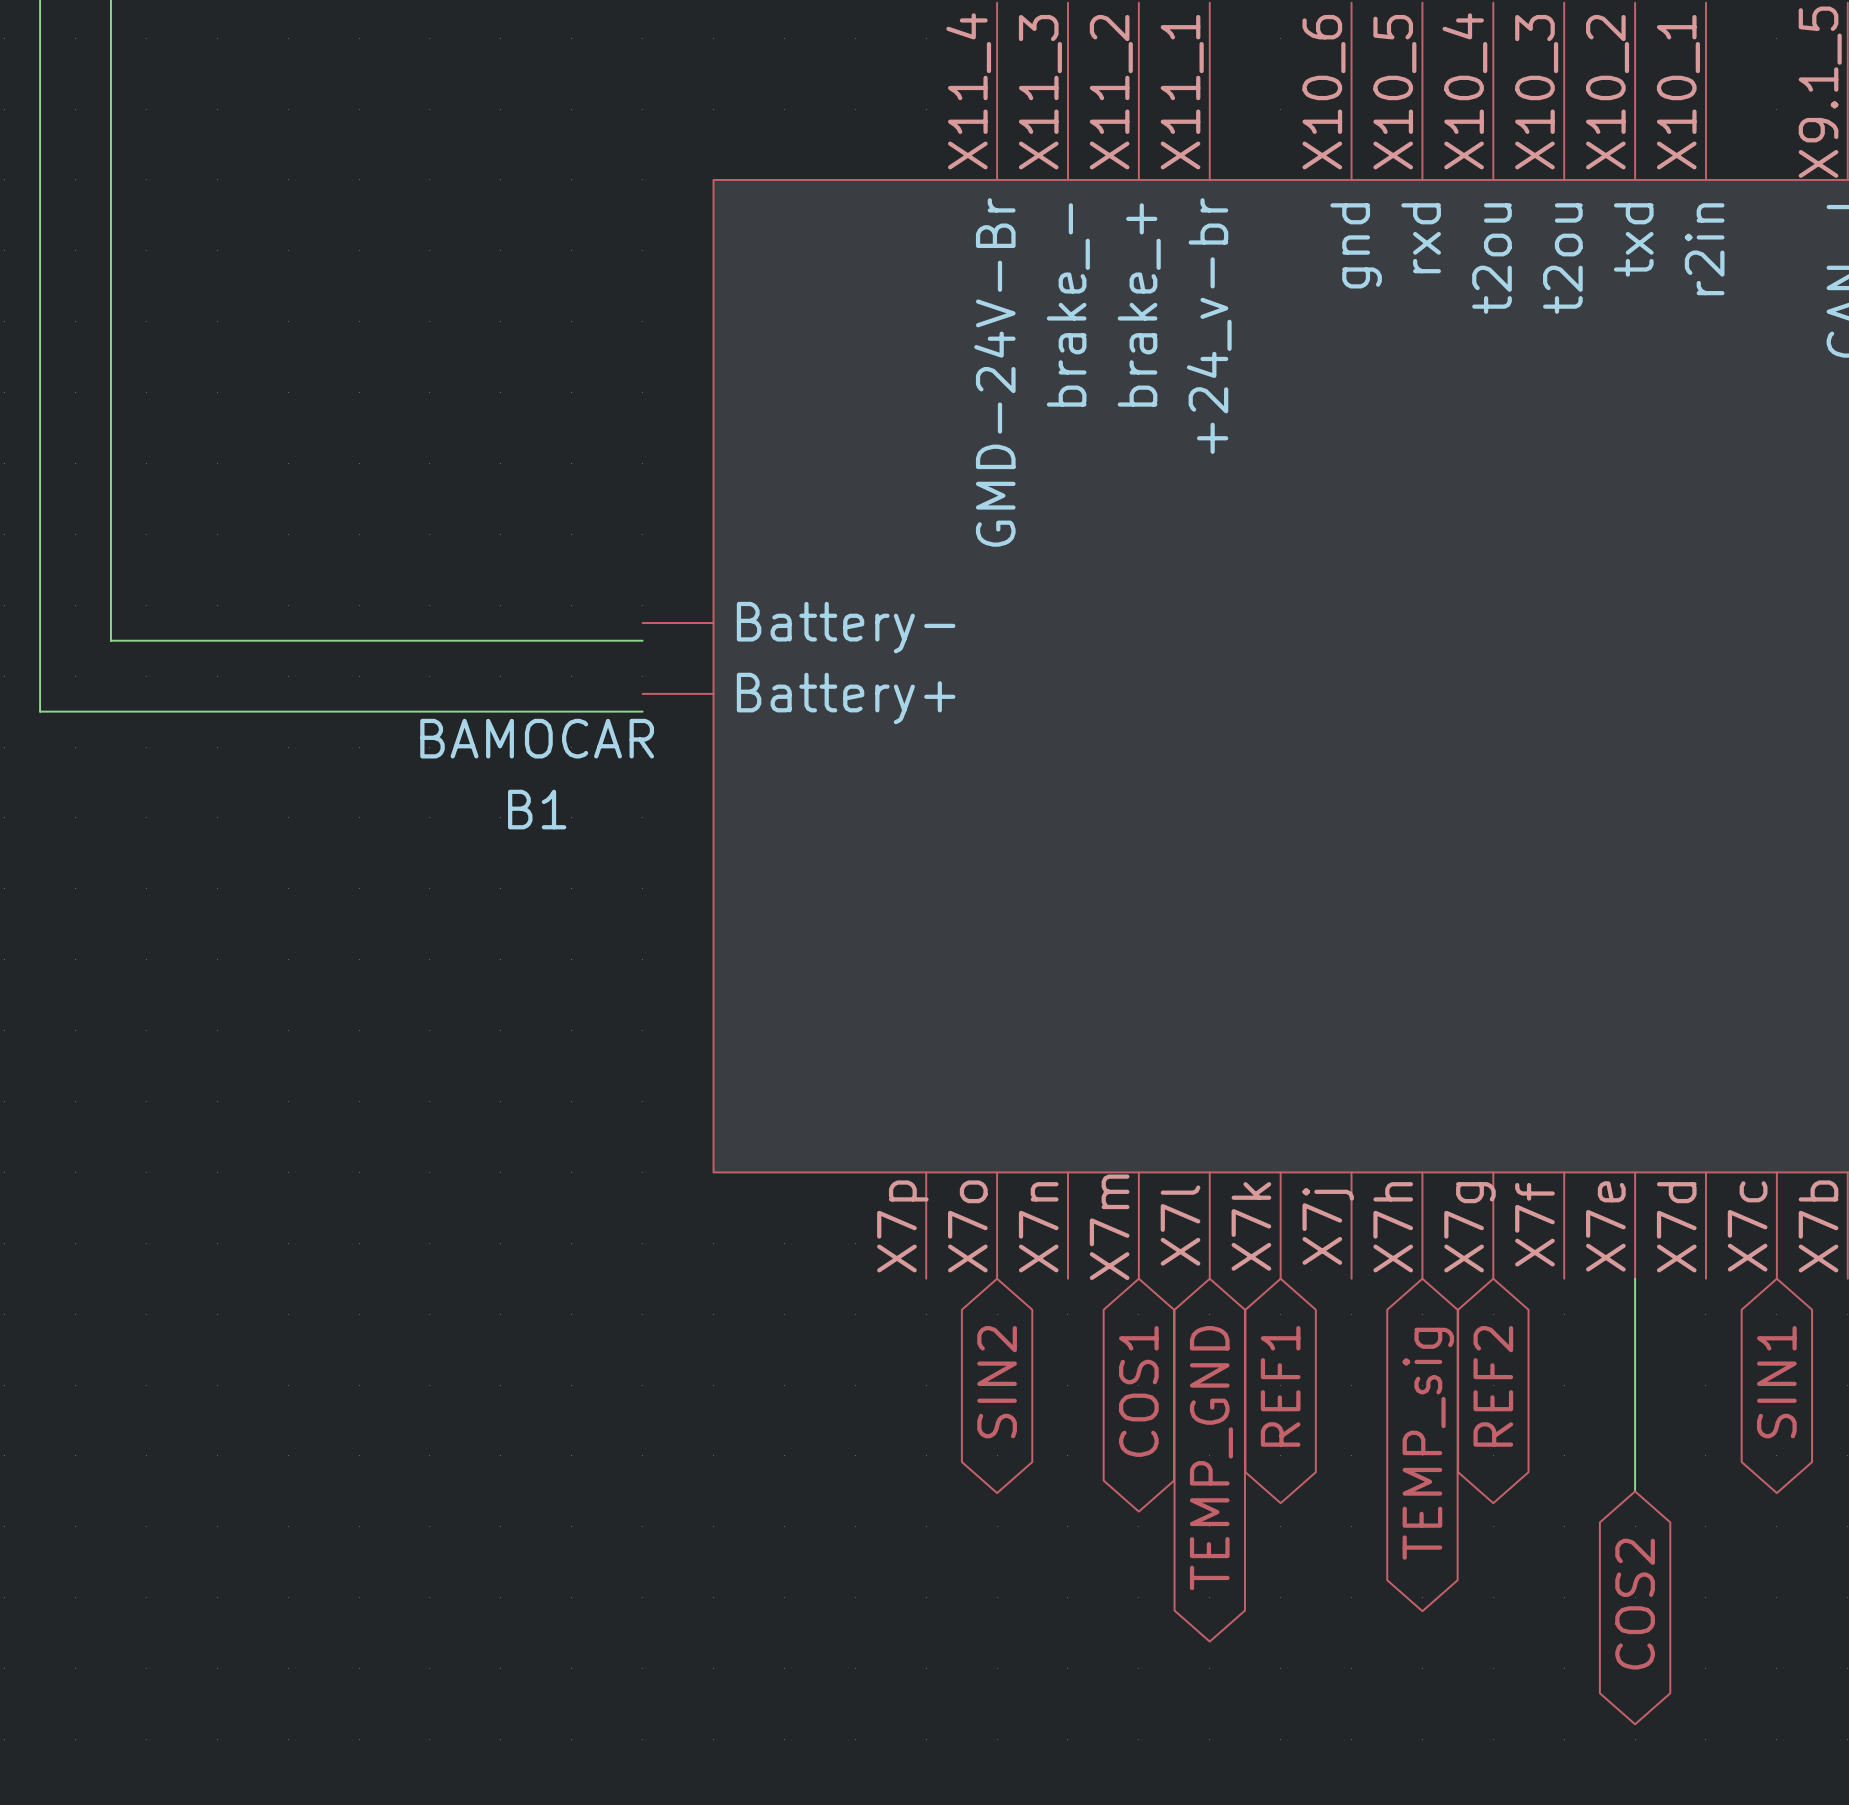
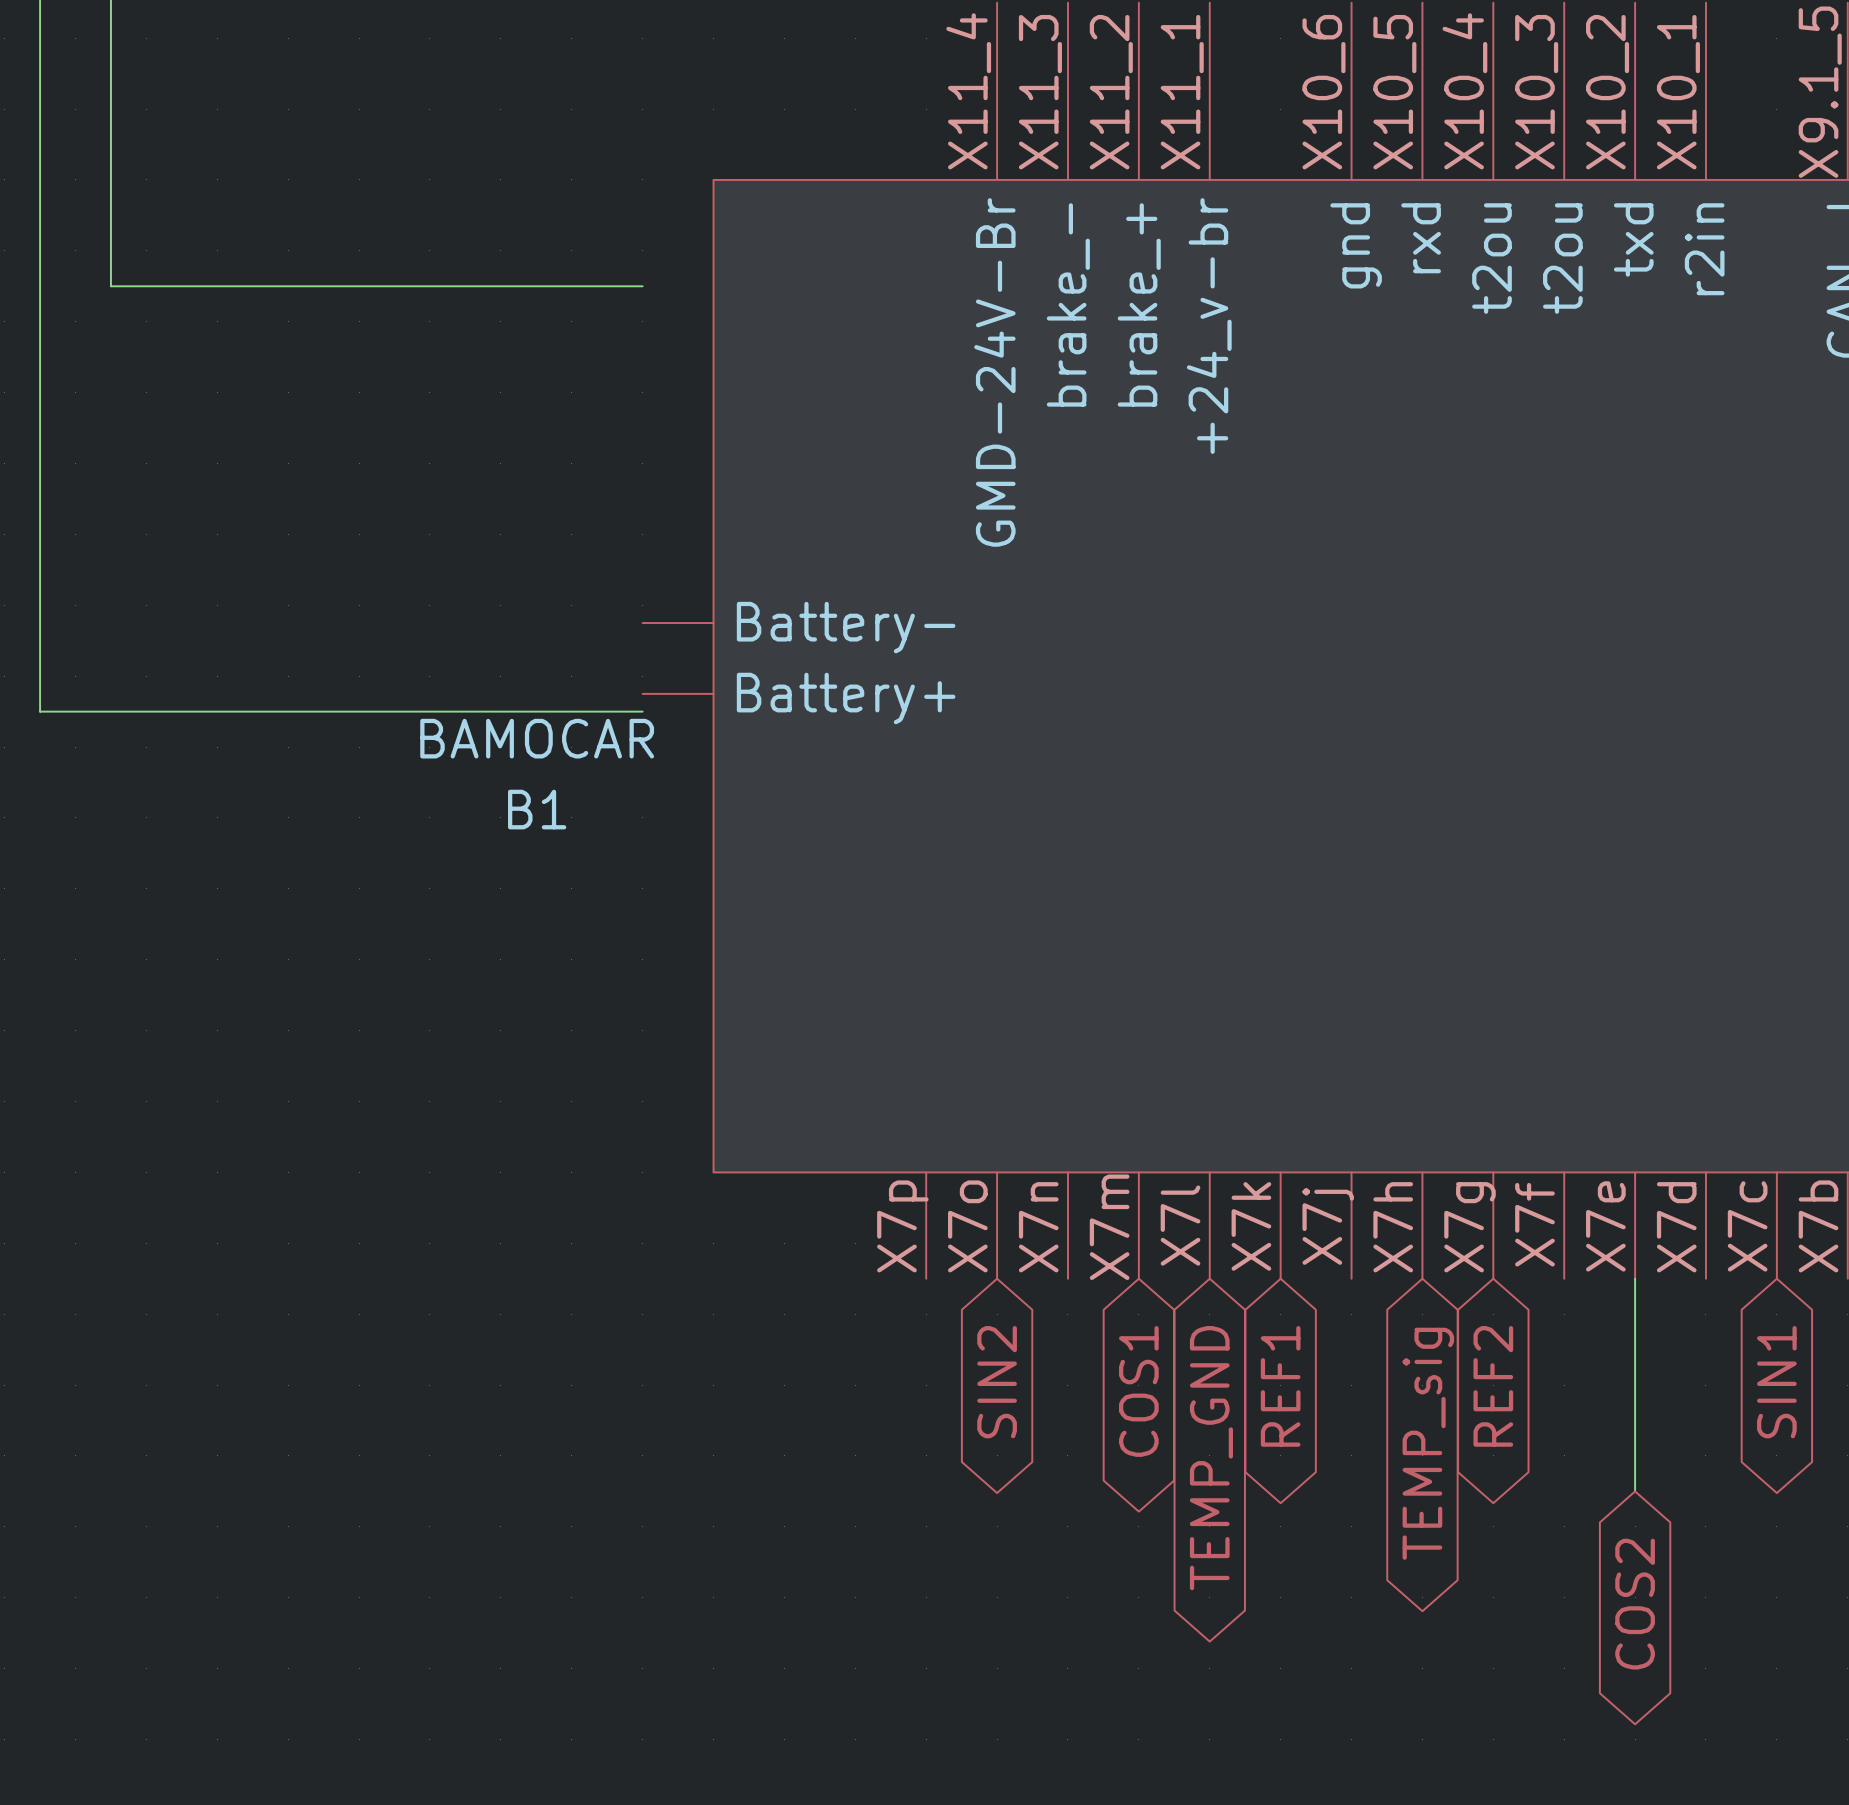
wire: (110, 286) (110, 640) (642, 640) -> (110, 286) (642, 286)

